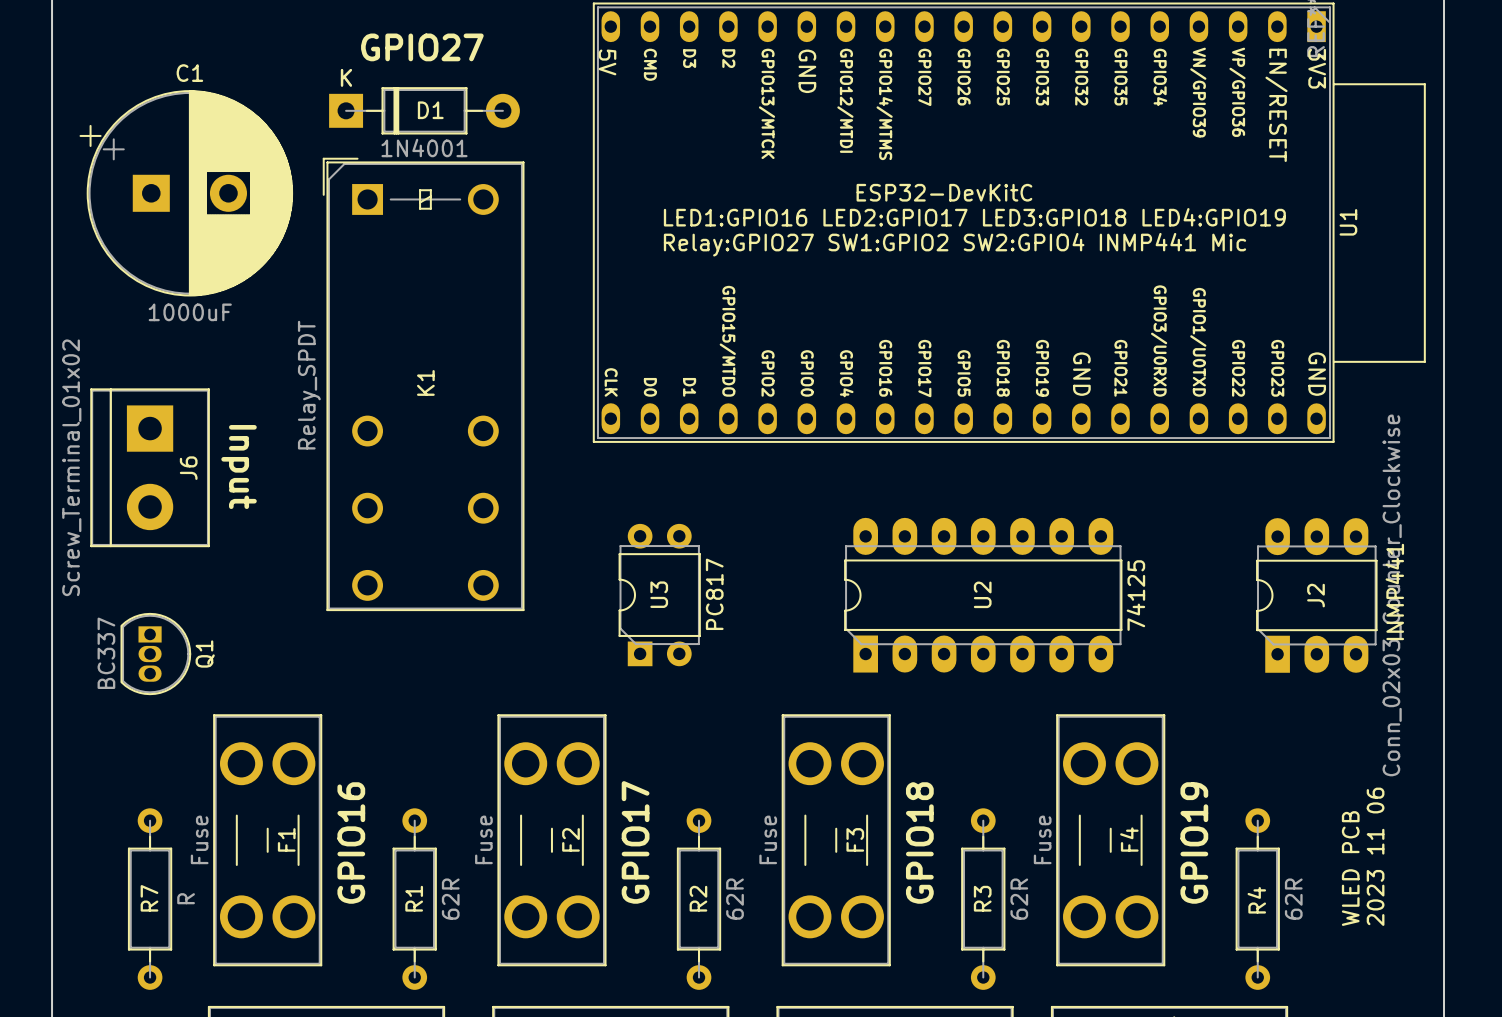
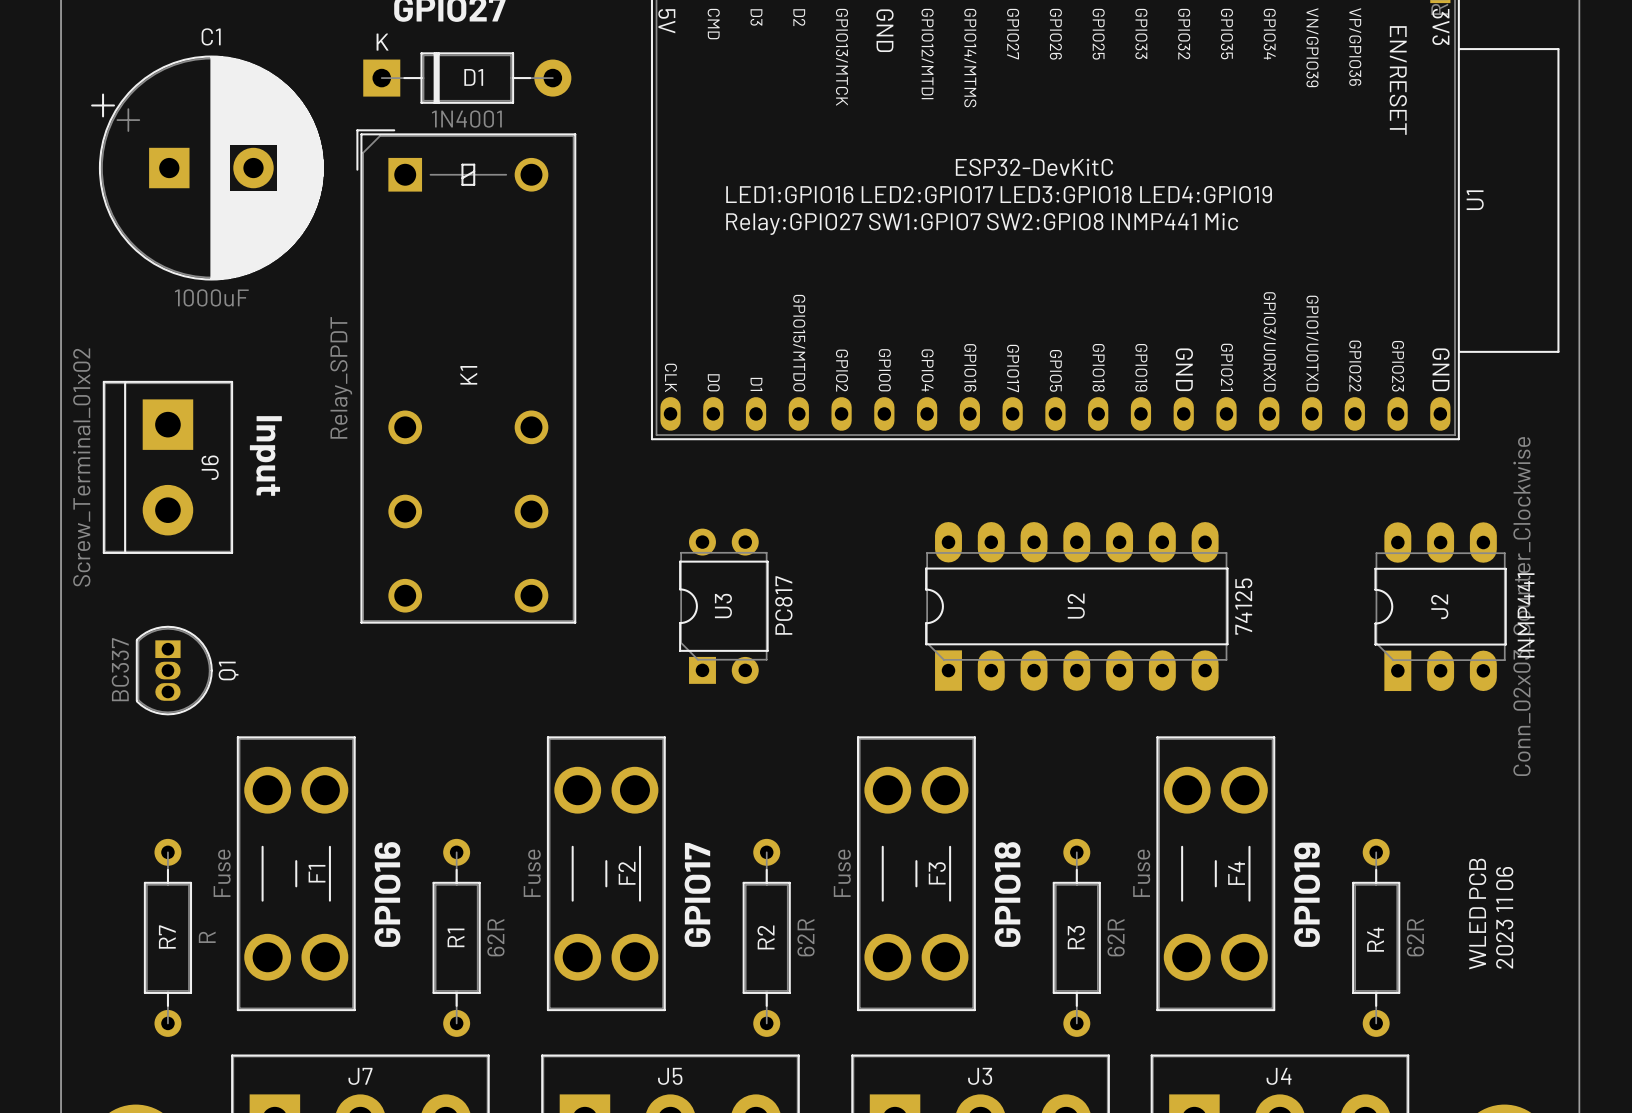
text: Relay:GPIO27 SW1:GPIO2 SW2:GPIO4 INMP441 Mic (954, 244) -> Relay:GPIO27 SW1:GPIO7 SW2:GPIO8 INMP441 Mic (982, 223)

